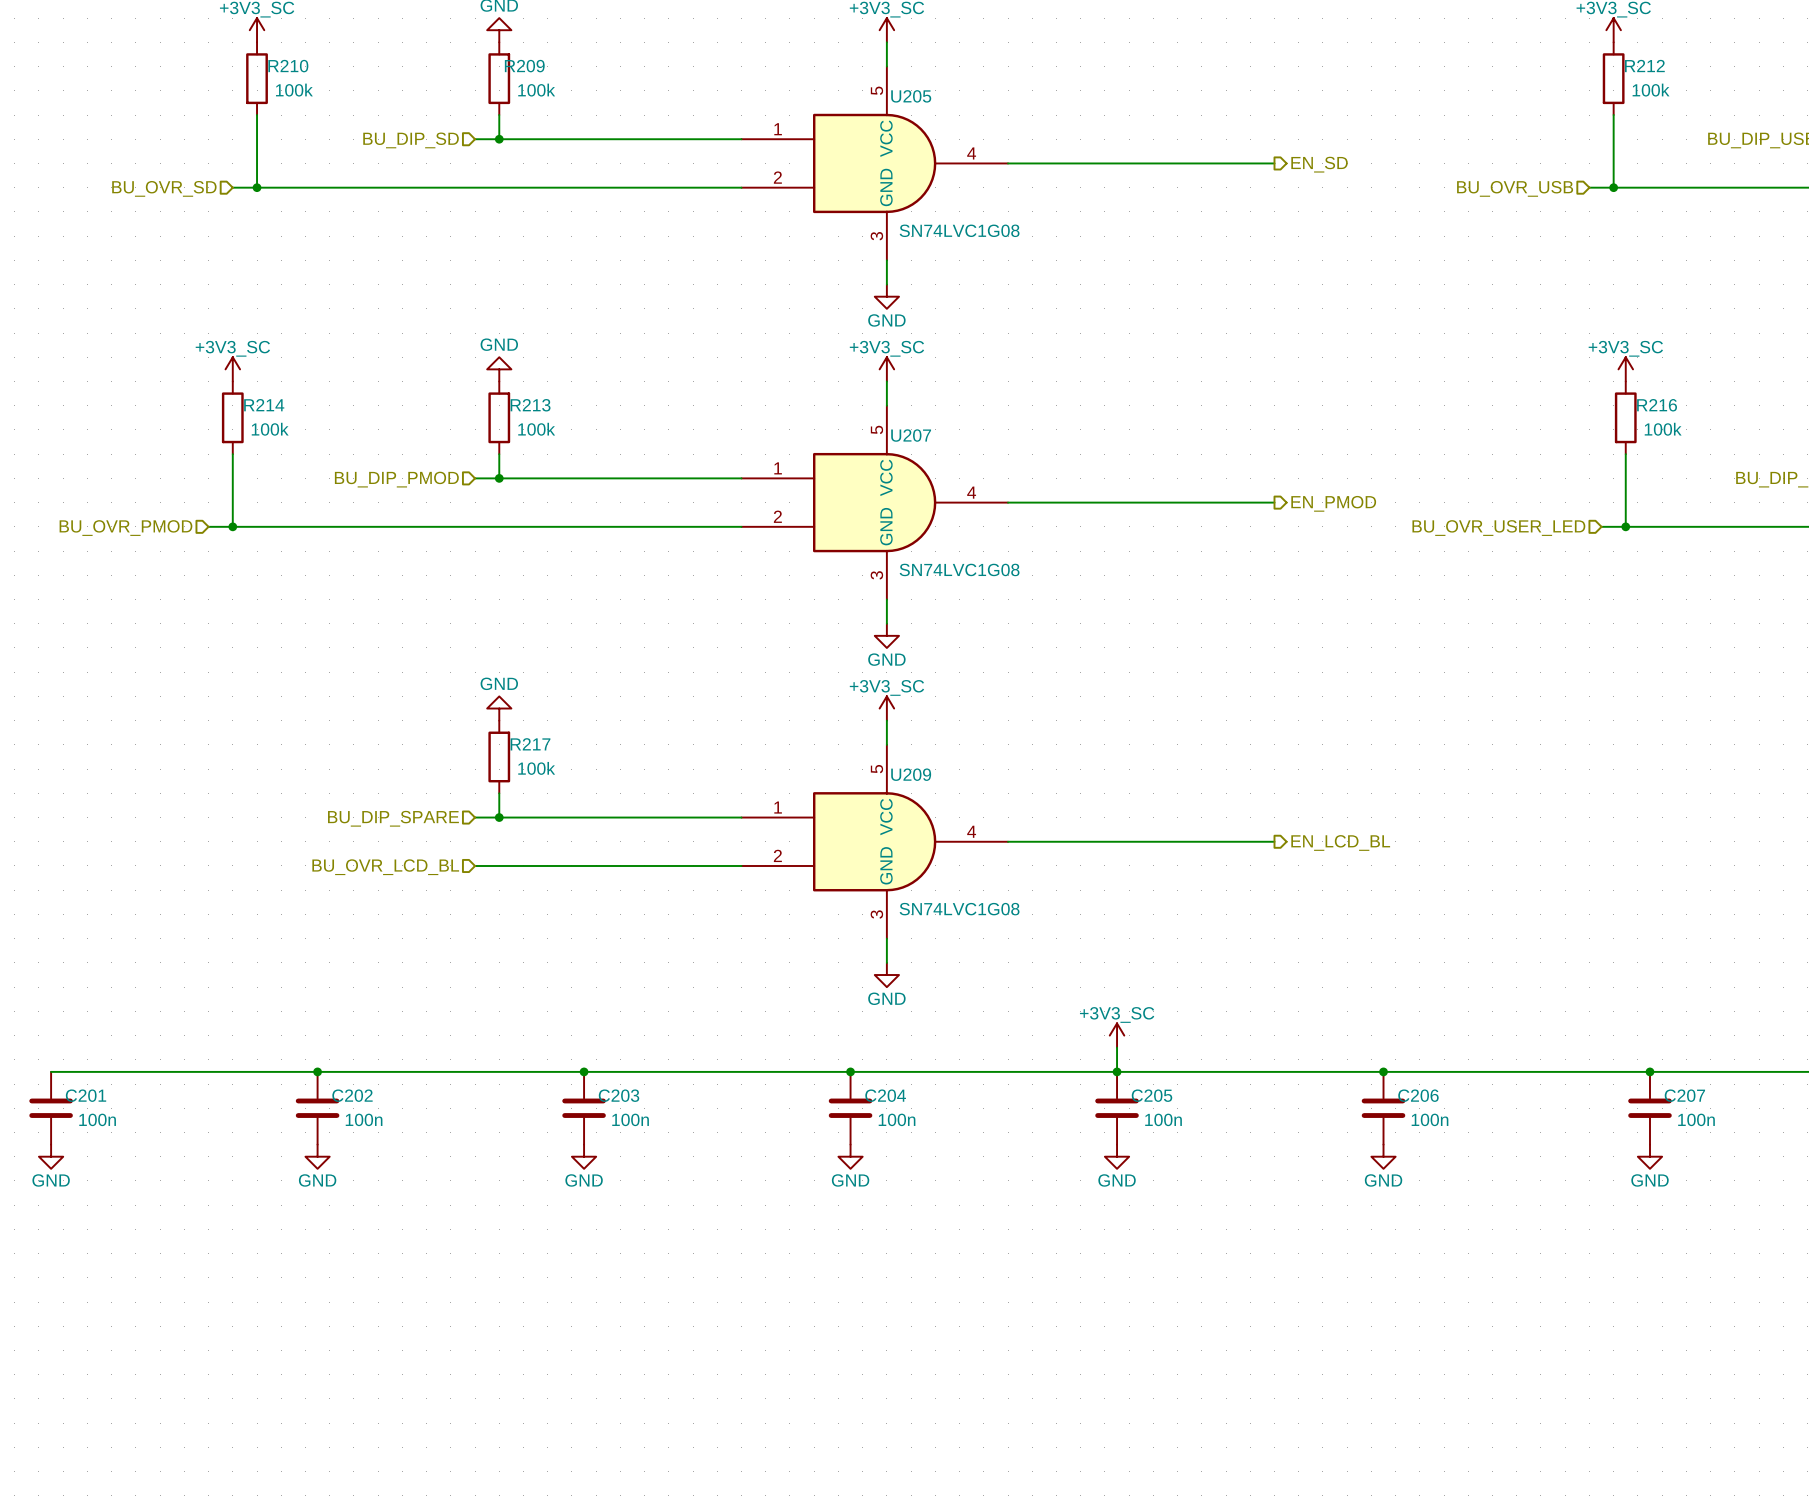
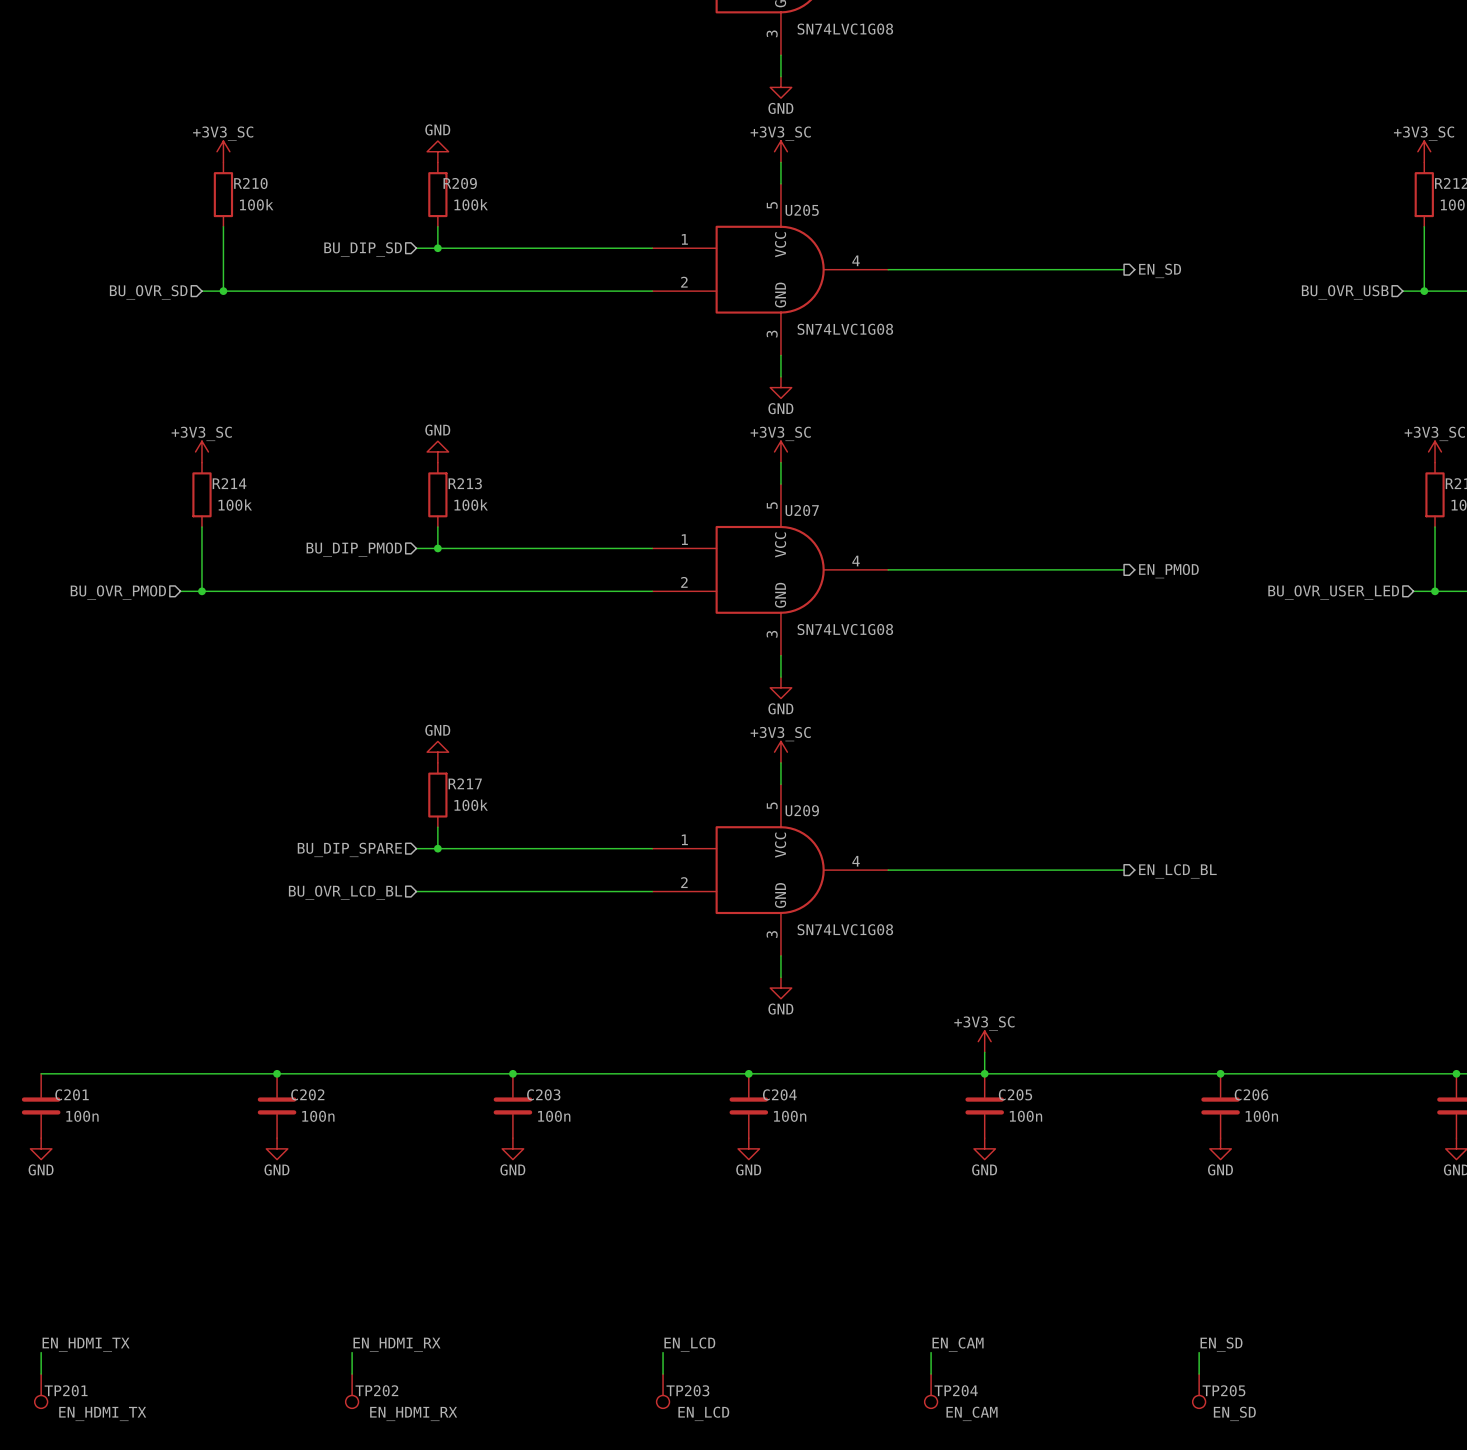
label: none -> EN_HDMI_TX (86, 1344)
label: none -> EN_HDMI_RX (397, 1344)
label: none -> EN_LCD (689, 1344)
label: none -> EN_CAM (958, 1344)
label: none -> EN_SD (1221, 1344)
wire: none -> (41, 1352) (41, 1374)
wire: none -> (352, 1352) (352, 1374)
wire: none -> (663, 1352) (663, 1374)
wire: none -> (931, 1352) (931, 1374)
wire: none -> (1199, 1352) (1199, 1374)
TP201: none -> EN_HDMI_TX (41, 1391)
TP202: none -> EN_HDMI_RX (352, 1391)
TP203: none -> EN_LCD (663, 1391)
TP204: none -> EN_CAM (931, 1391)
TP205: none -> EN_SD (1199, 1391)

